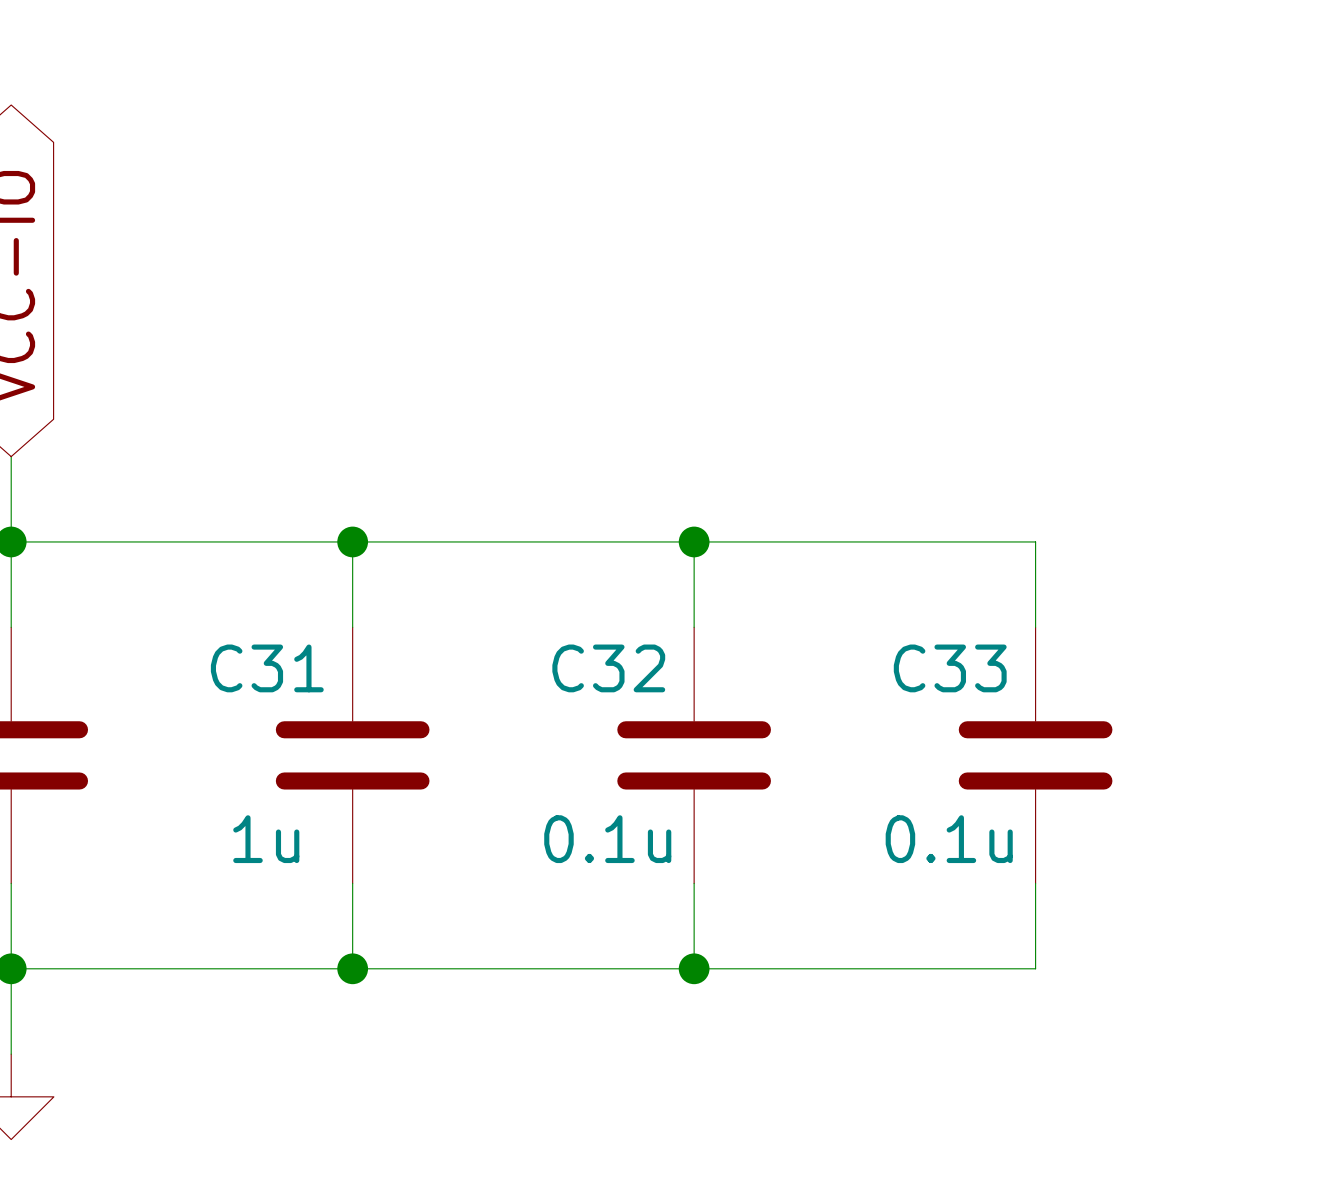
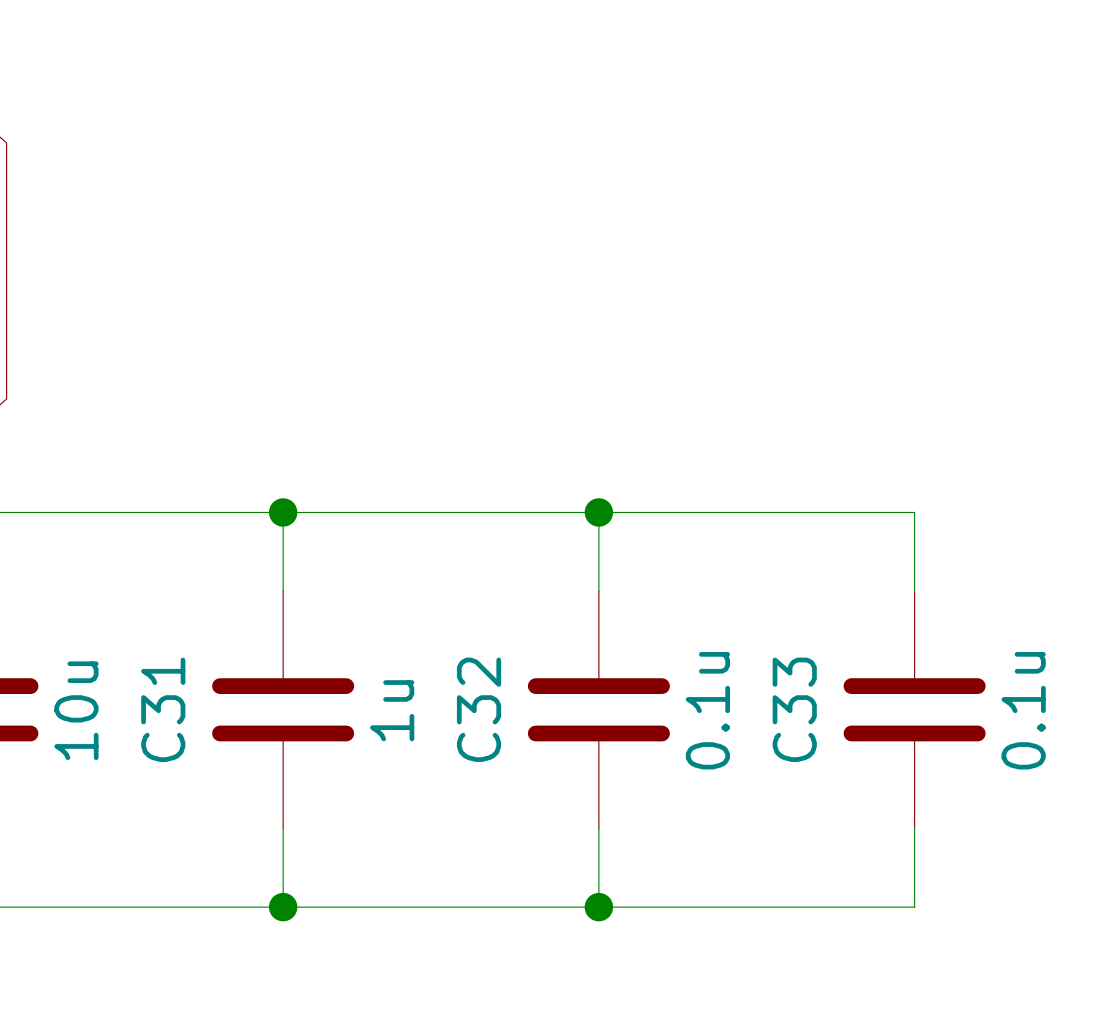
C31 name rotation: 0° (267, 668) -> 90° counterclockwise (163, 709)
C32 name rotation: 0° (608, 668) -> 90° counterclockwise (479, 709)
C33 name rotation: 0° (950, 668) -> 90° counterclockwise (794, 709)
part value: none -> 10u (76, 710)
C31 value rotation: 0° (266, 839) -> 90° counterclockwise (392, 710)
C31 value position: 1u (266, 839) -> 1u (392, 710)
C32 value rotation: 0° (607, 839) -> 90° counterclockwise (707, 710)
C32 value position: 0.1u (607, 839) -> 0.1u (707, 710)
C33 value rotation: 0° (949, 839) -> 90° counterclockwise (1023, 710)
C33 value position: 0.1u (949, 839) -> 0.1u (1023, 710)

